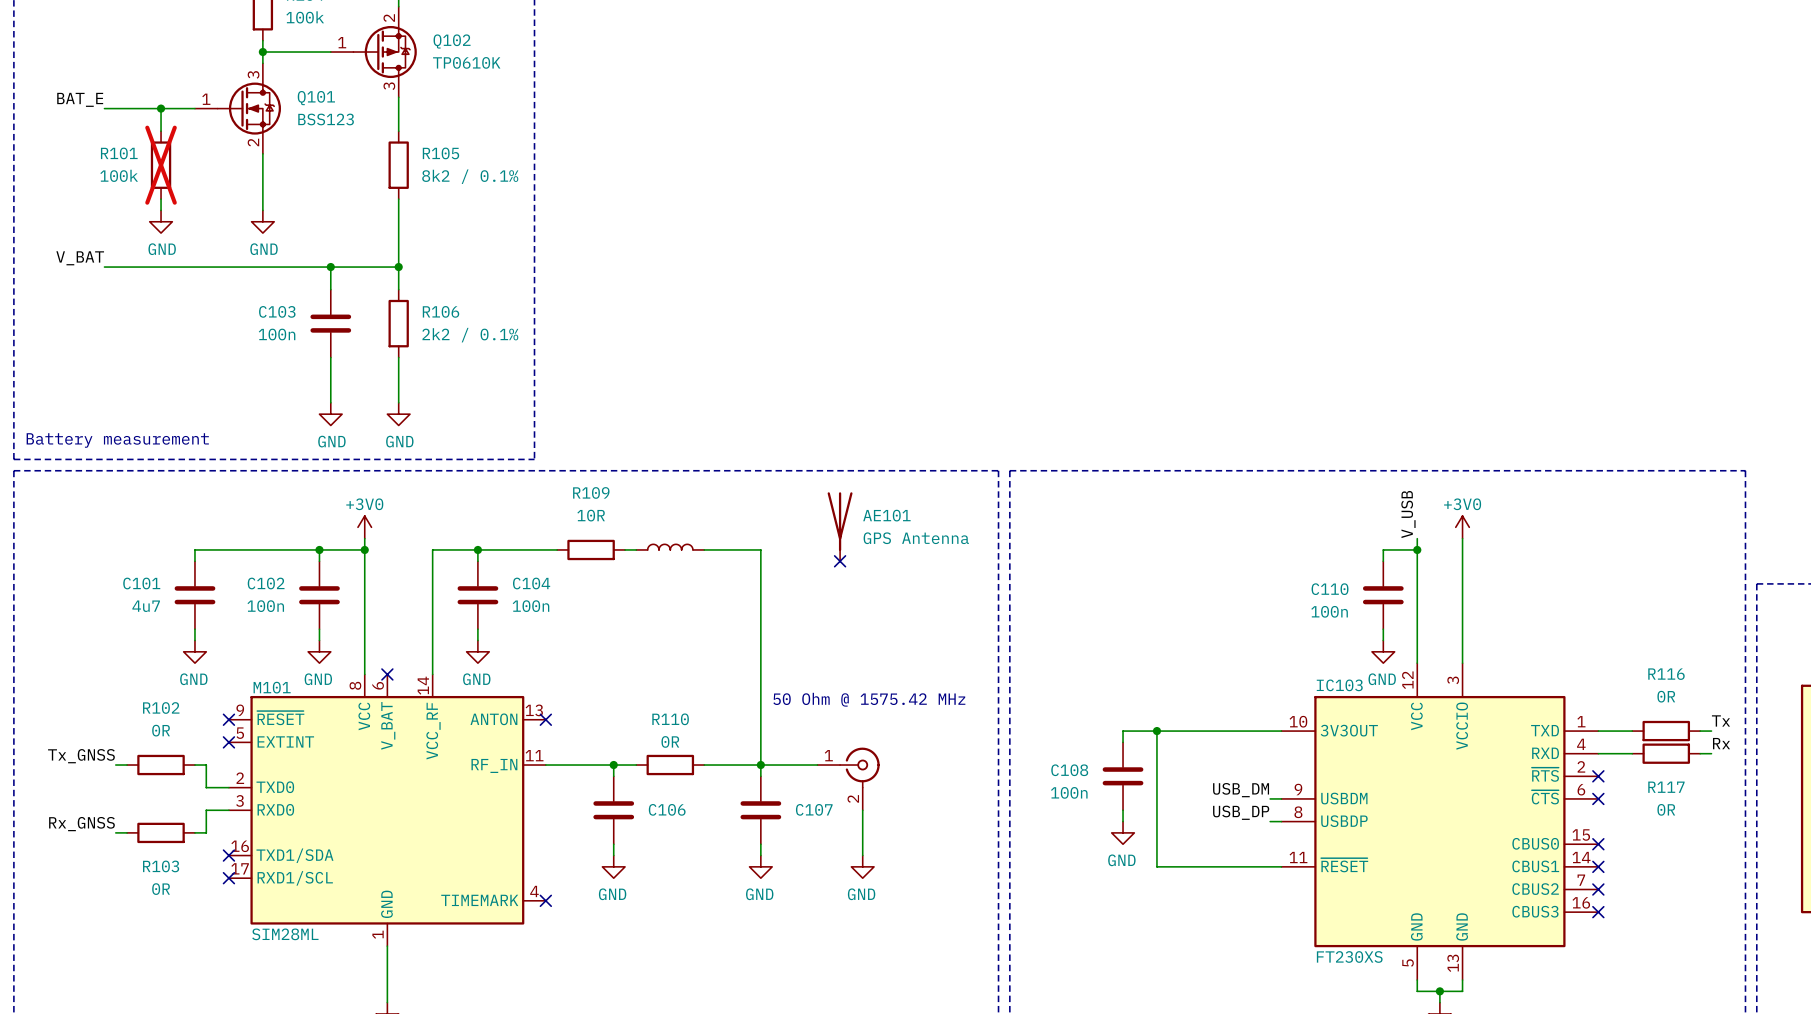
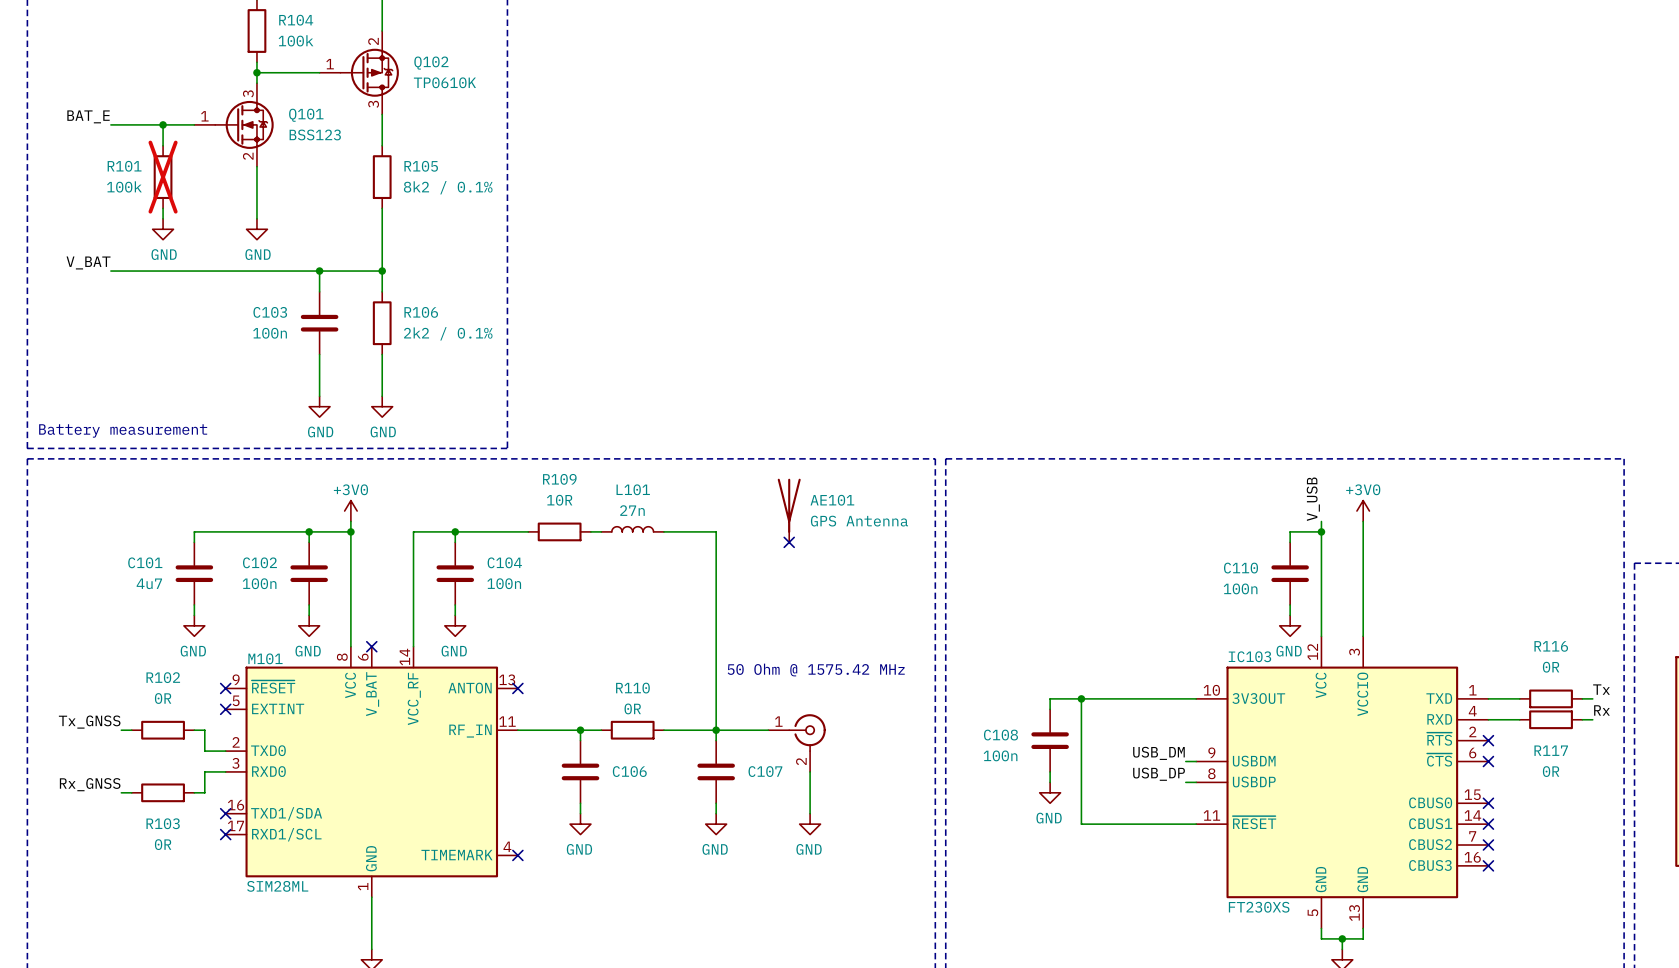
L101 name: none -> L101 (633, 489)
L101 value: none -> 27n (632, 510)

